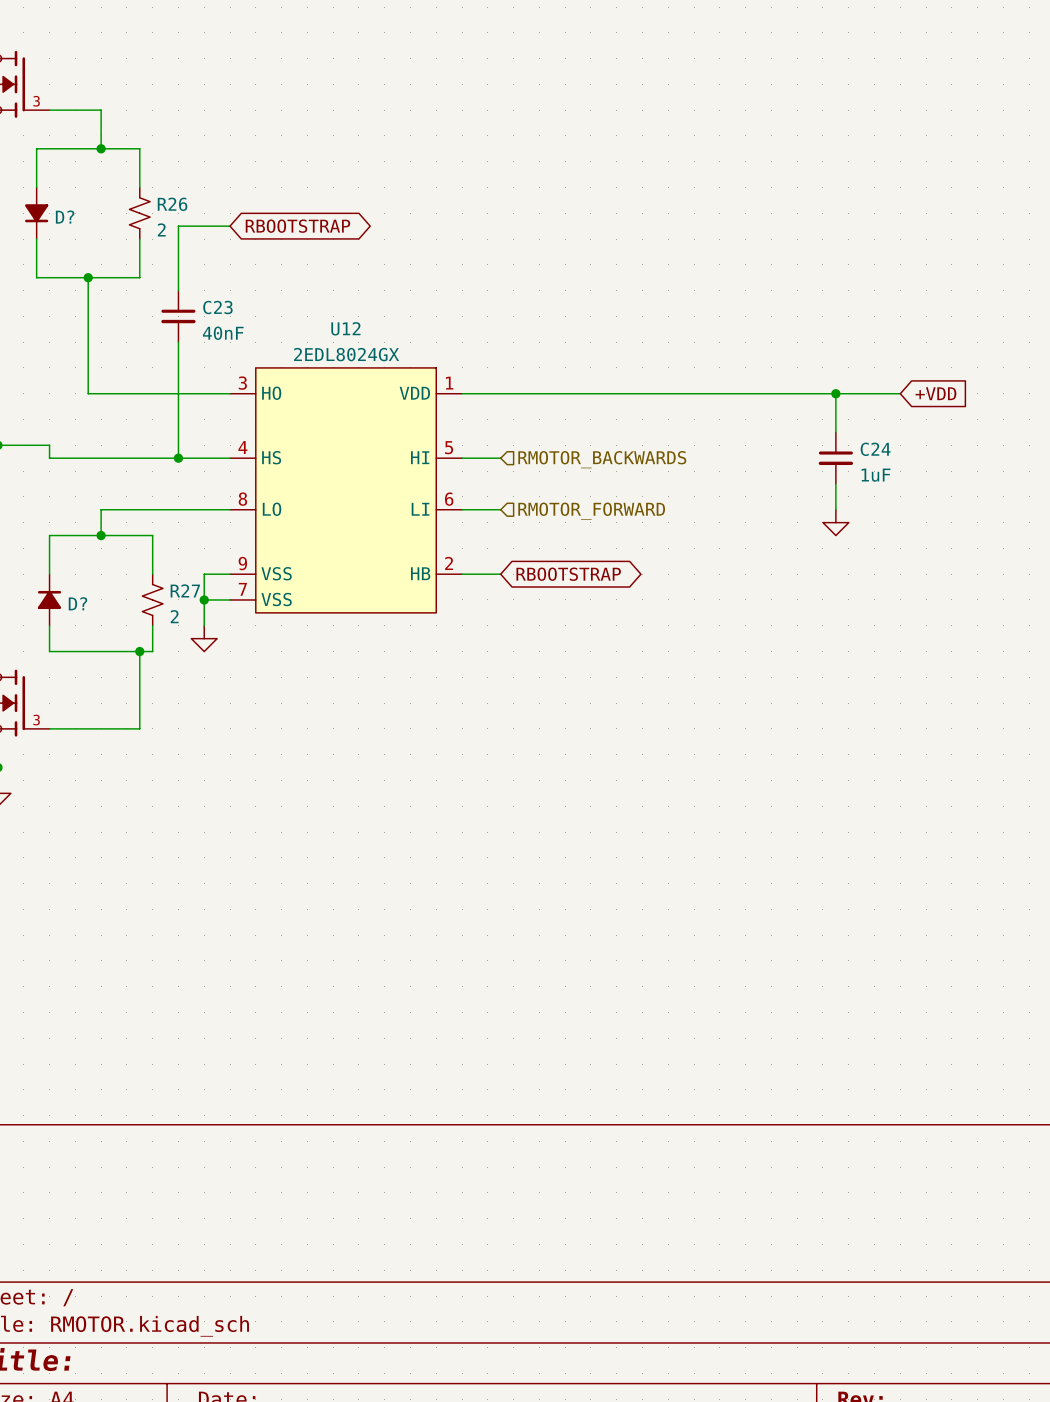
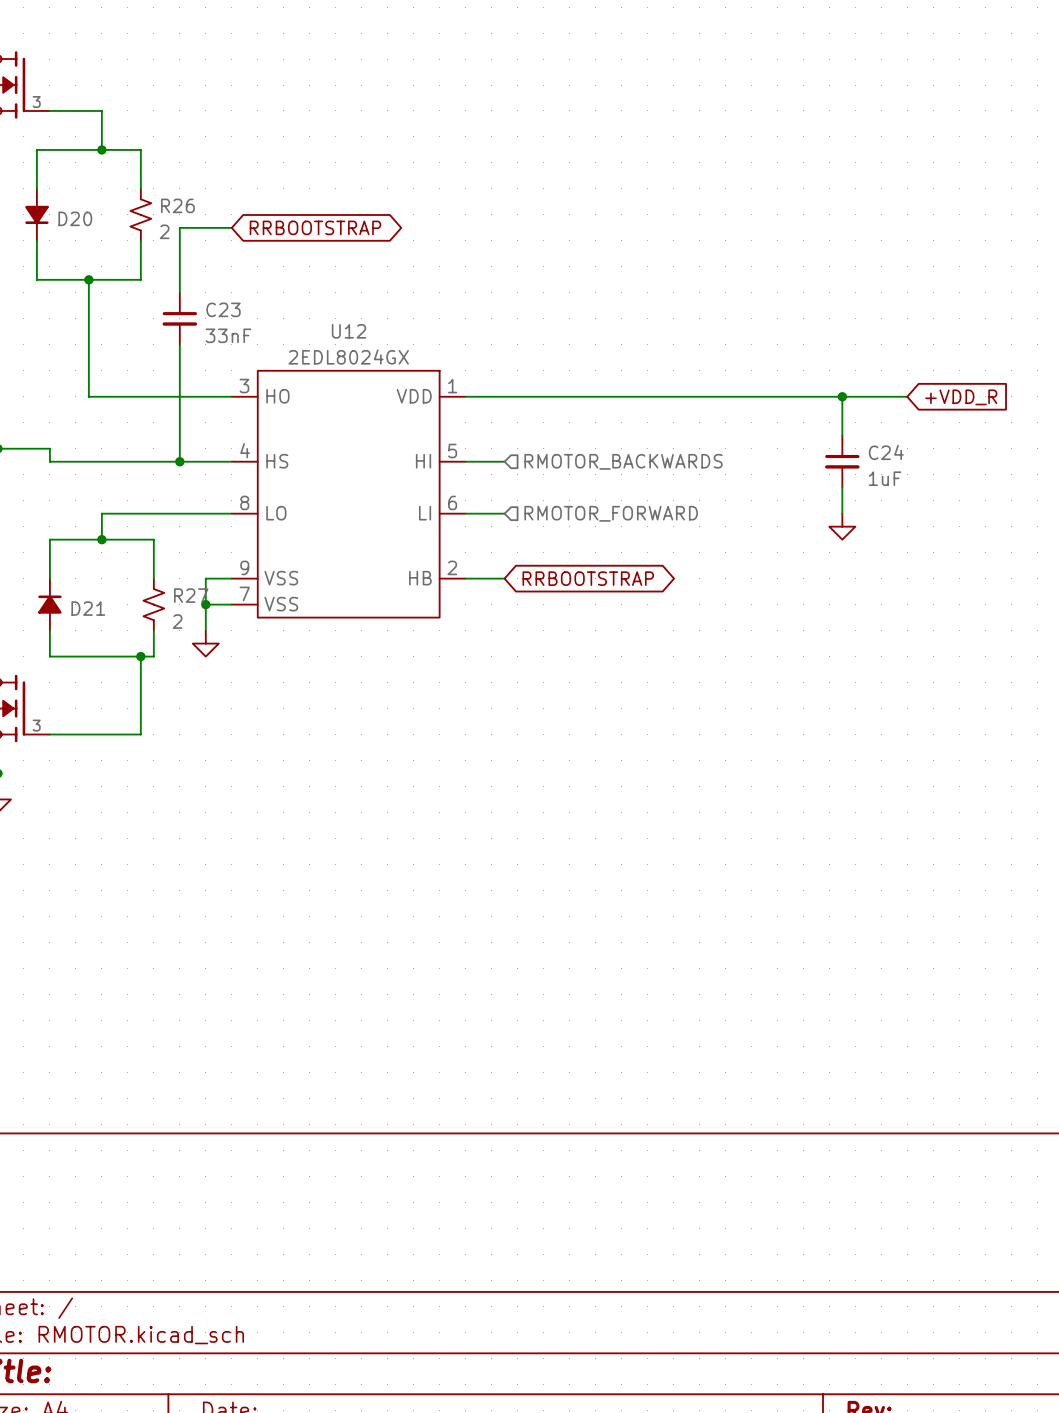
D? name: D? (65, 217) -> D20 (75, 218)
global label: RBOOTSTRAP (297, 226) -> RRBOOTSTRAP (315, 227)
C23 value: 40nF (223, 333) -> 33nF (228, 335)
global label: +VDD (935, 393) -> +VDD_R (961, 397)
global label: RBOOTSTRAP (568, 574) -> RRBOOTSTRAP (588, 578)
D? name: D? (77, 603) -> D21 (88, 608)

